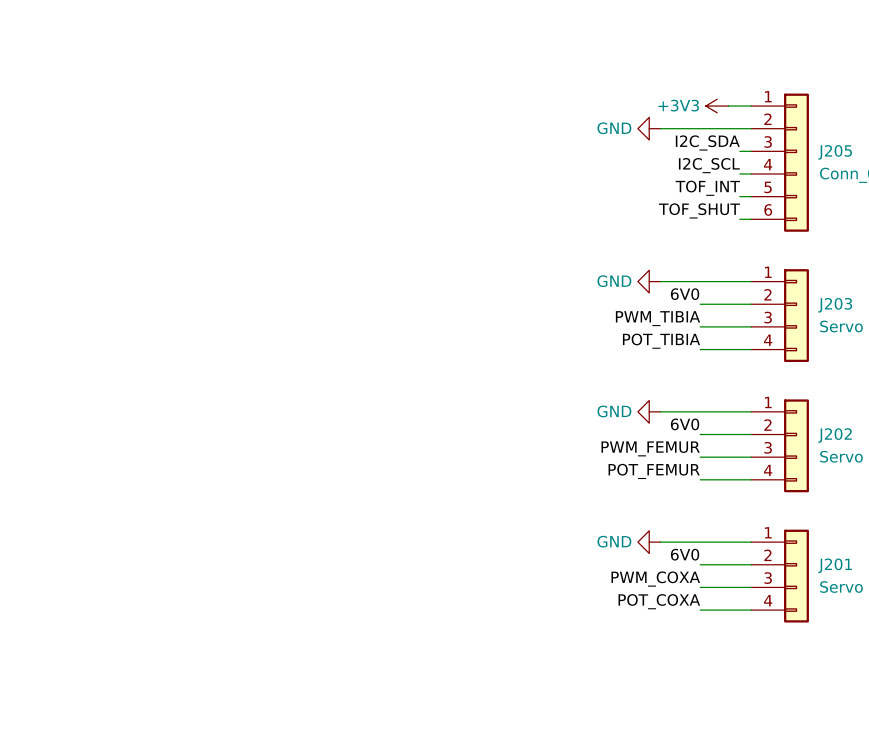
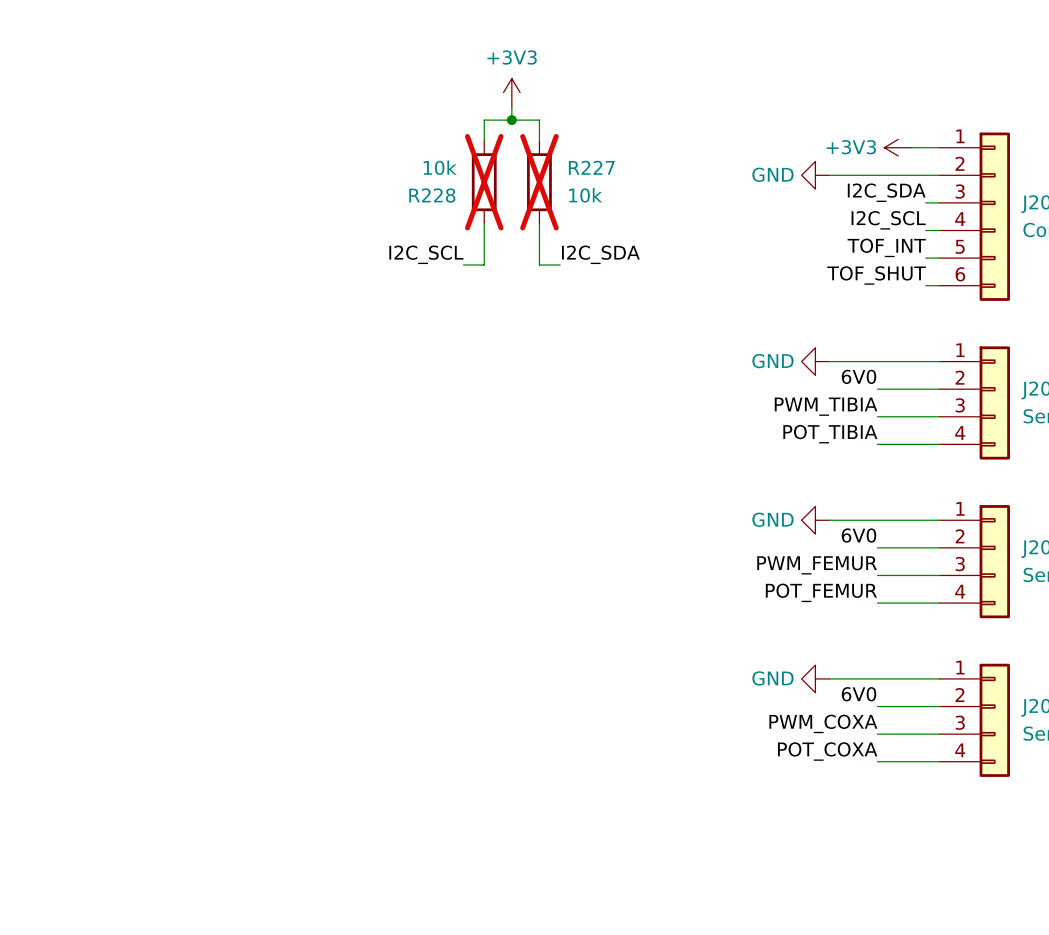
power symbol: none -> +3V3 (511, 92)
wire: none -> (511, 106) (511, 120)
junction: none -> (511, 120)
wire: none -> (484, 140) (484, 120) (539, 120) (539, 140)
R228: none -> 10k (484, 182)
R227: none -> 10k (539, 182)
wire: none -> (484, 223) (484, 265) (463, 265)
wire: none -> (539, 223) (539, 265) (560, 265)
label: none -> I2C_SCL (426, 254)
label: none -> I2C_SDA (600, 254)

